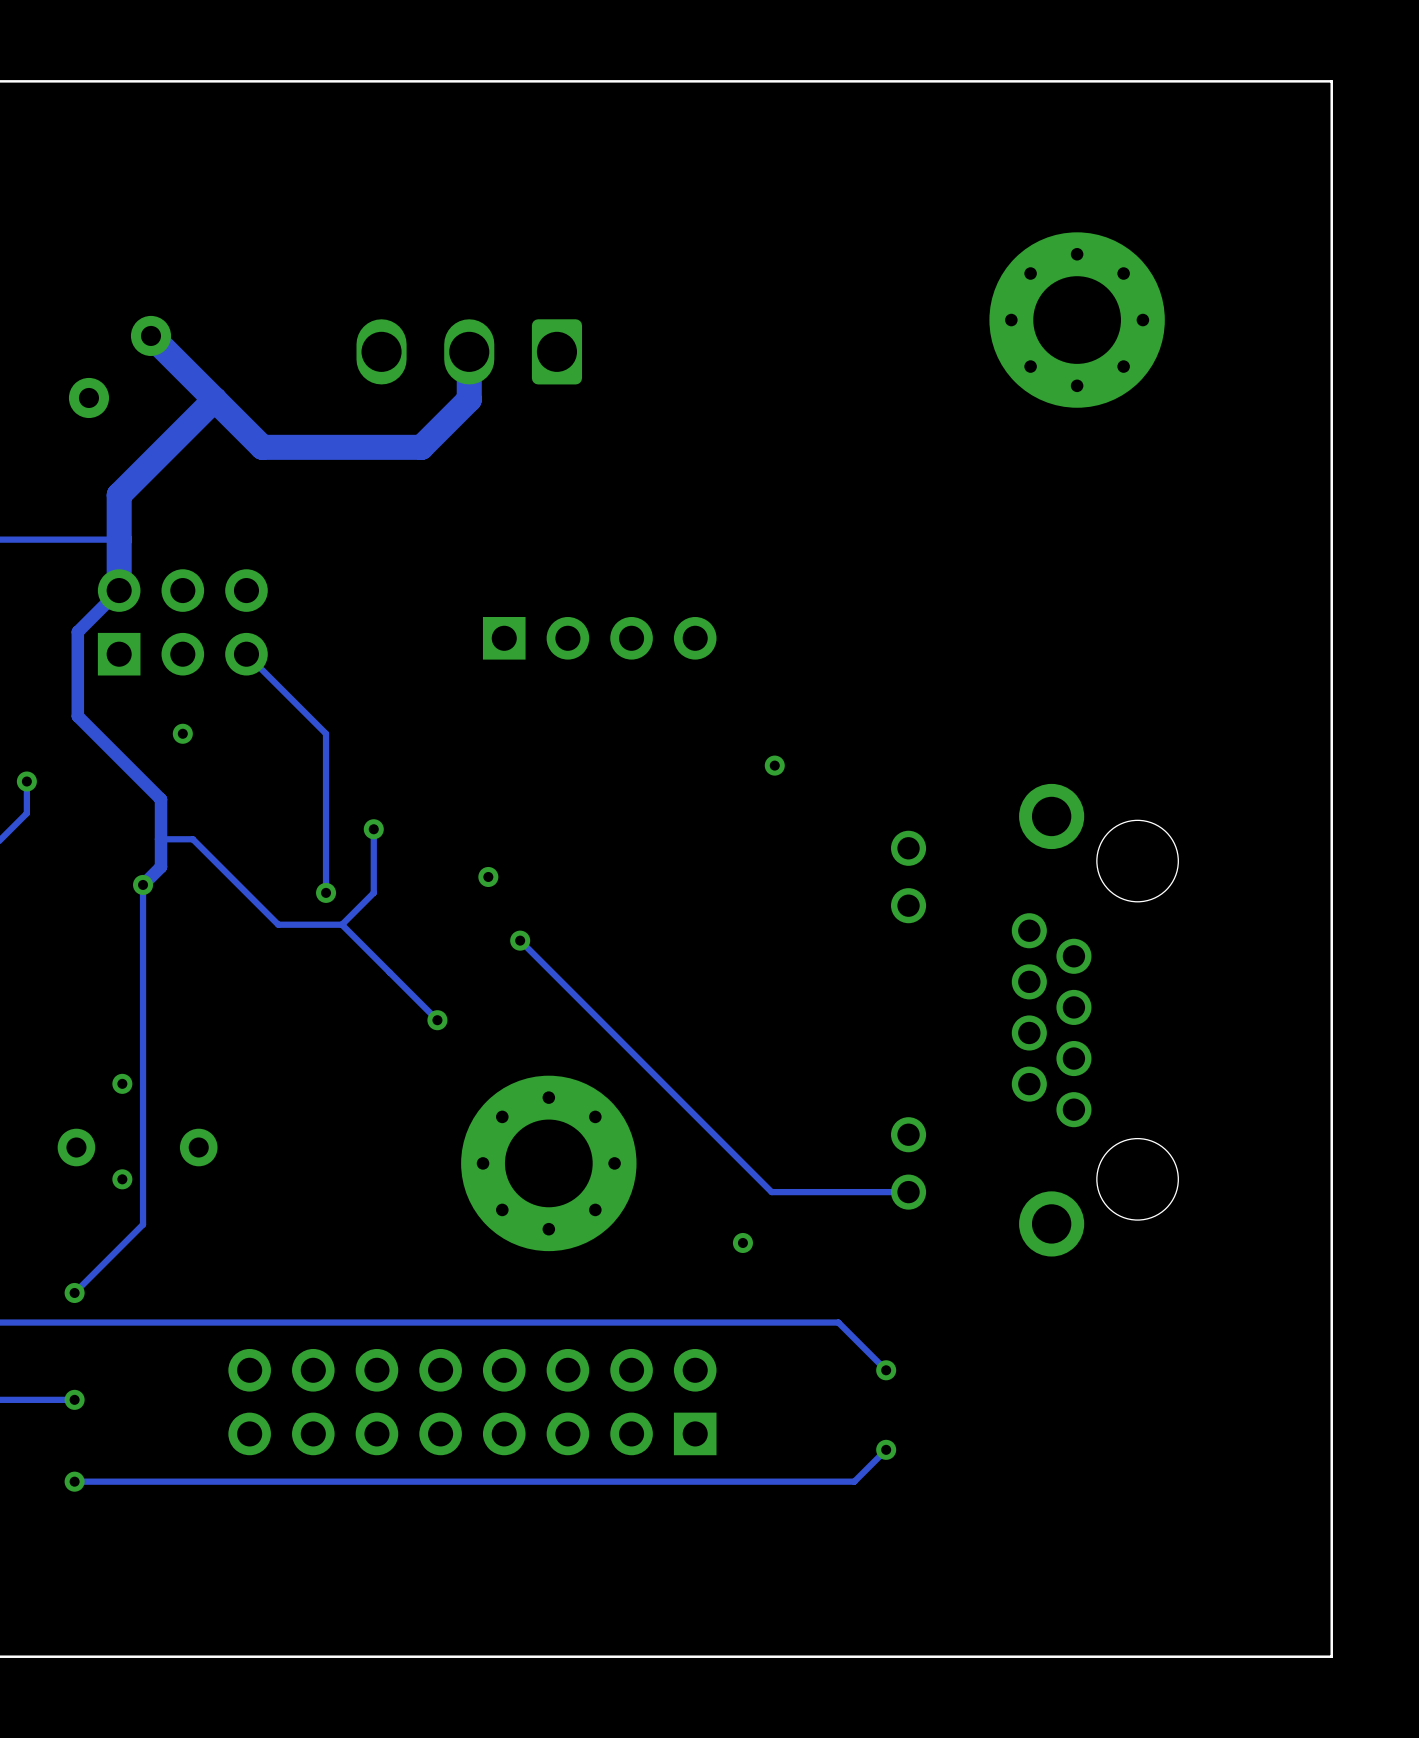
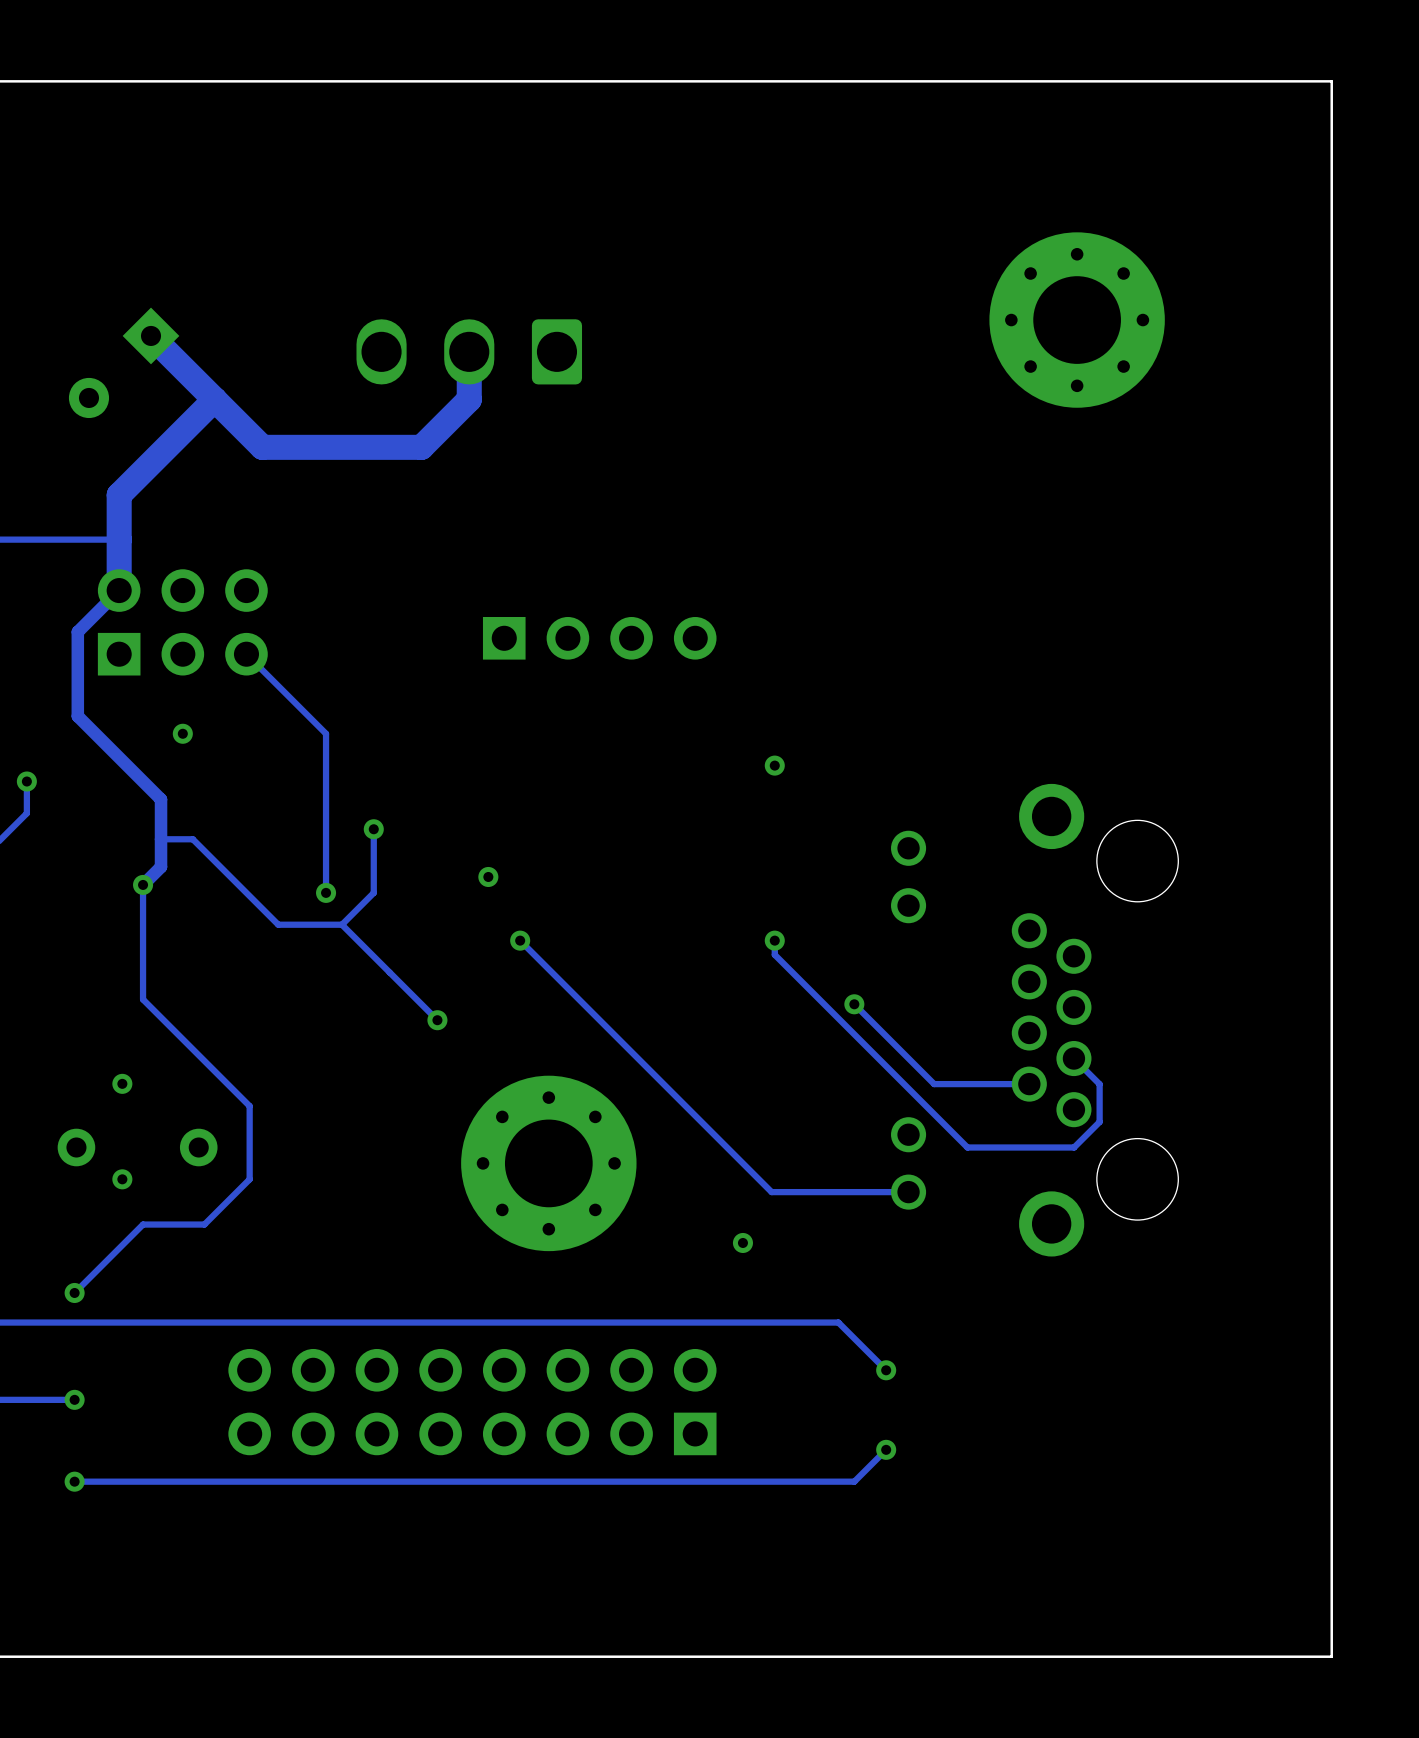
part footprint: [68, 315, 172, 419] -> [68, 307, 180, 419]
track: none -> (774, 940) (774, 954) (967, 1147) (1074, 1147) (1099, 1121) (1099, 1084) (1073, 1058)
via: none -> (774, 940)
track: (143, 999) (143, 1224) -> (143, 999) (249, 1106) (249, 1179) (204, 1224) (143, 1224)
track: none -> (854, 1004) (934, 1084) (1029, 1084)
via: none -> (854, 1004)

